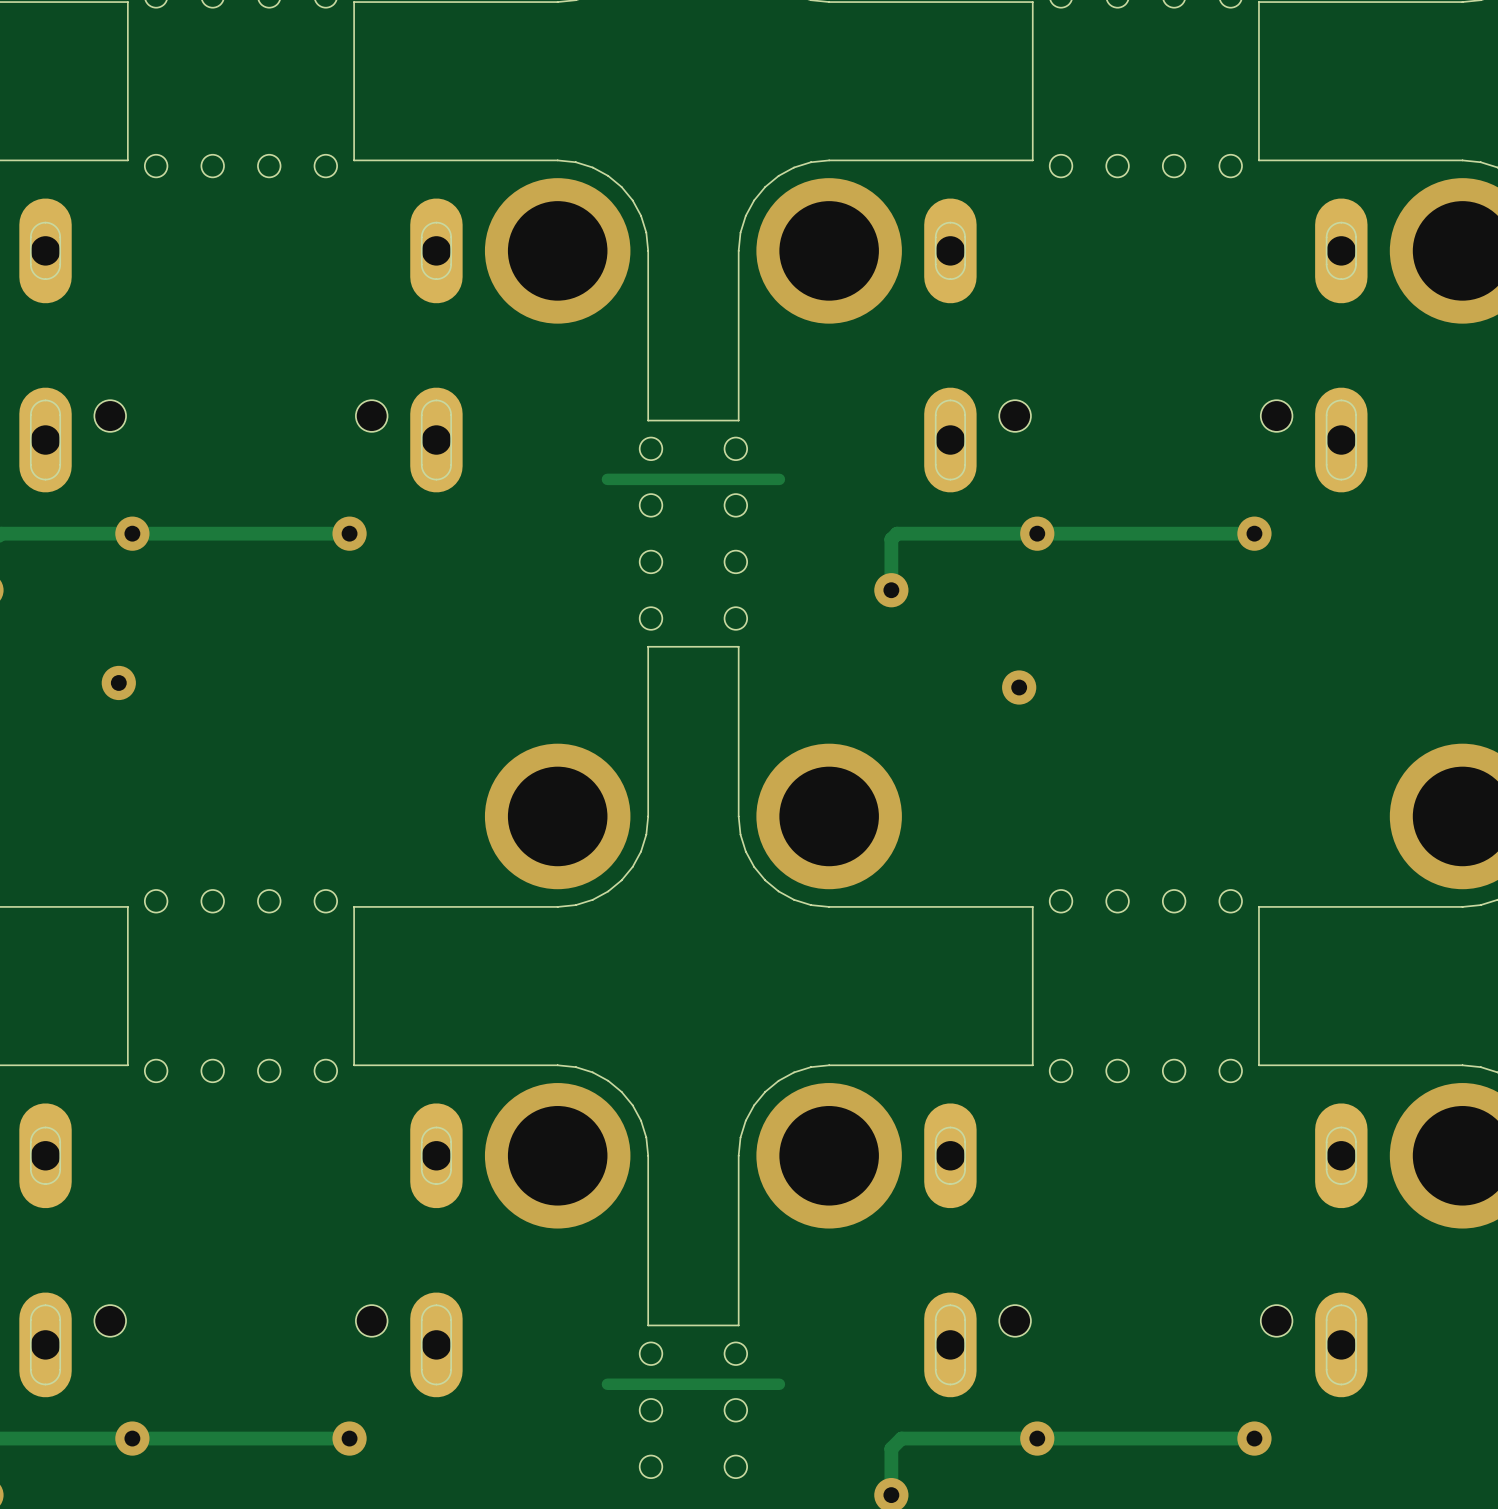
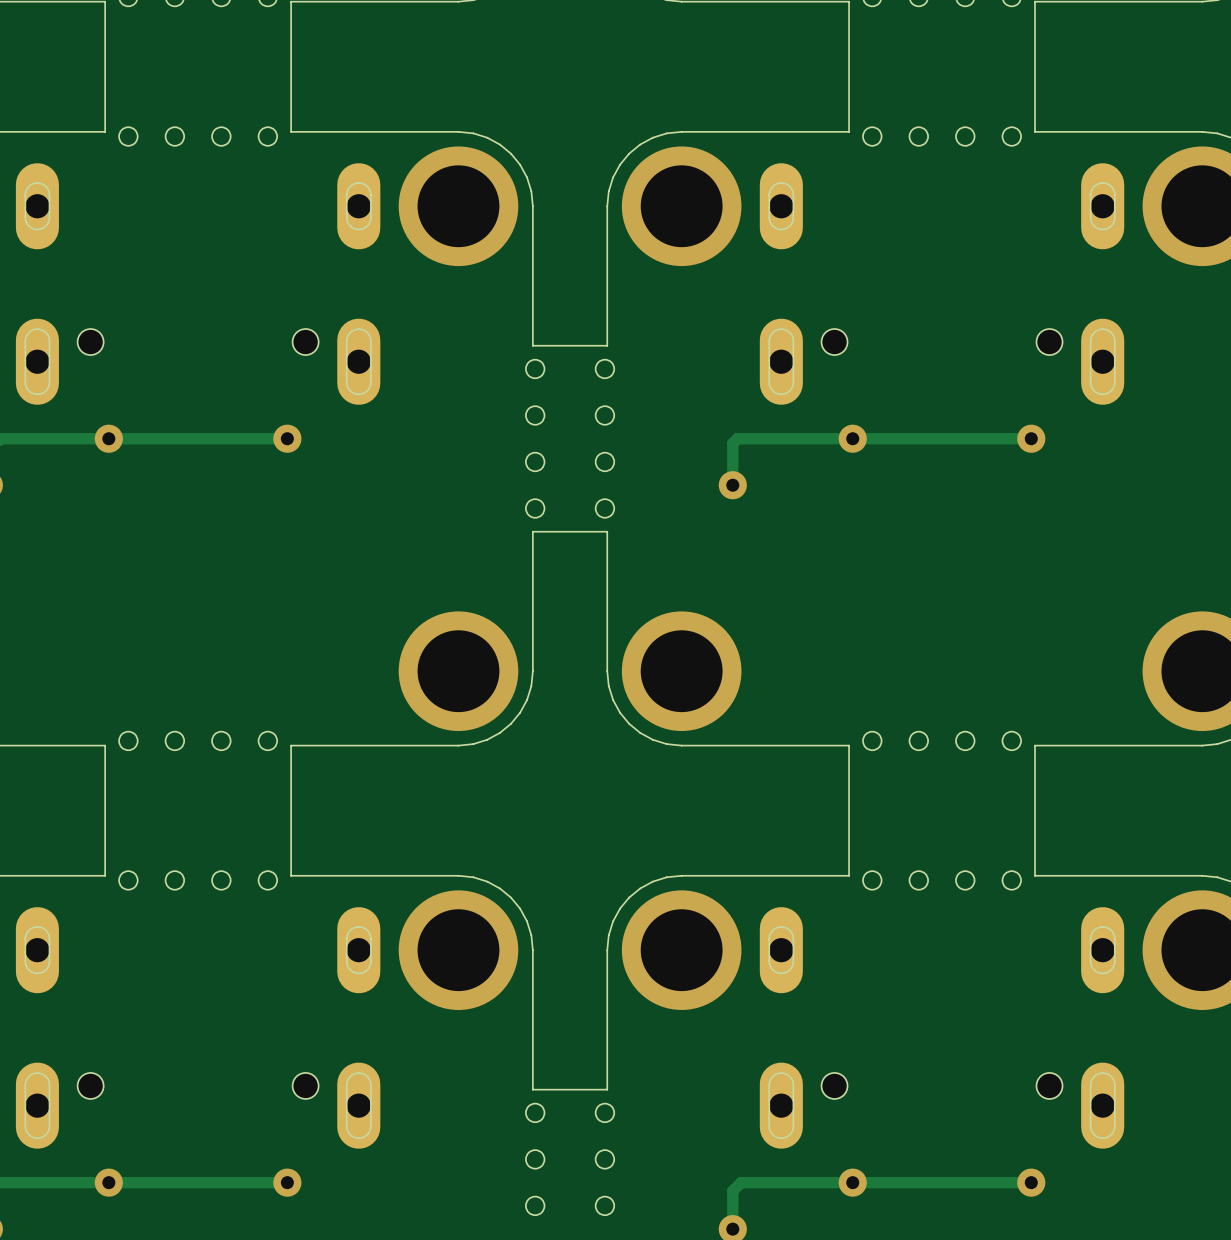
track: (779, 479) (607, 479) -> none
via: (118, 682) -> none
via: (1019, 687) -> none
track: (779, 1384) (607, 1384) -> none

